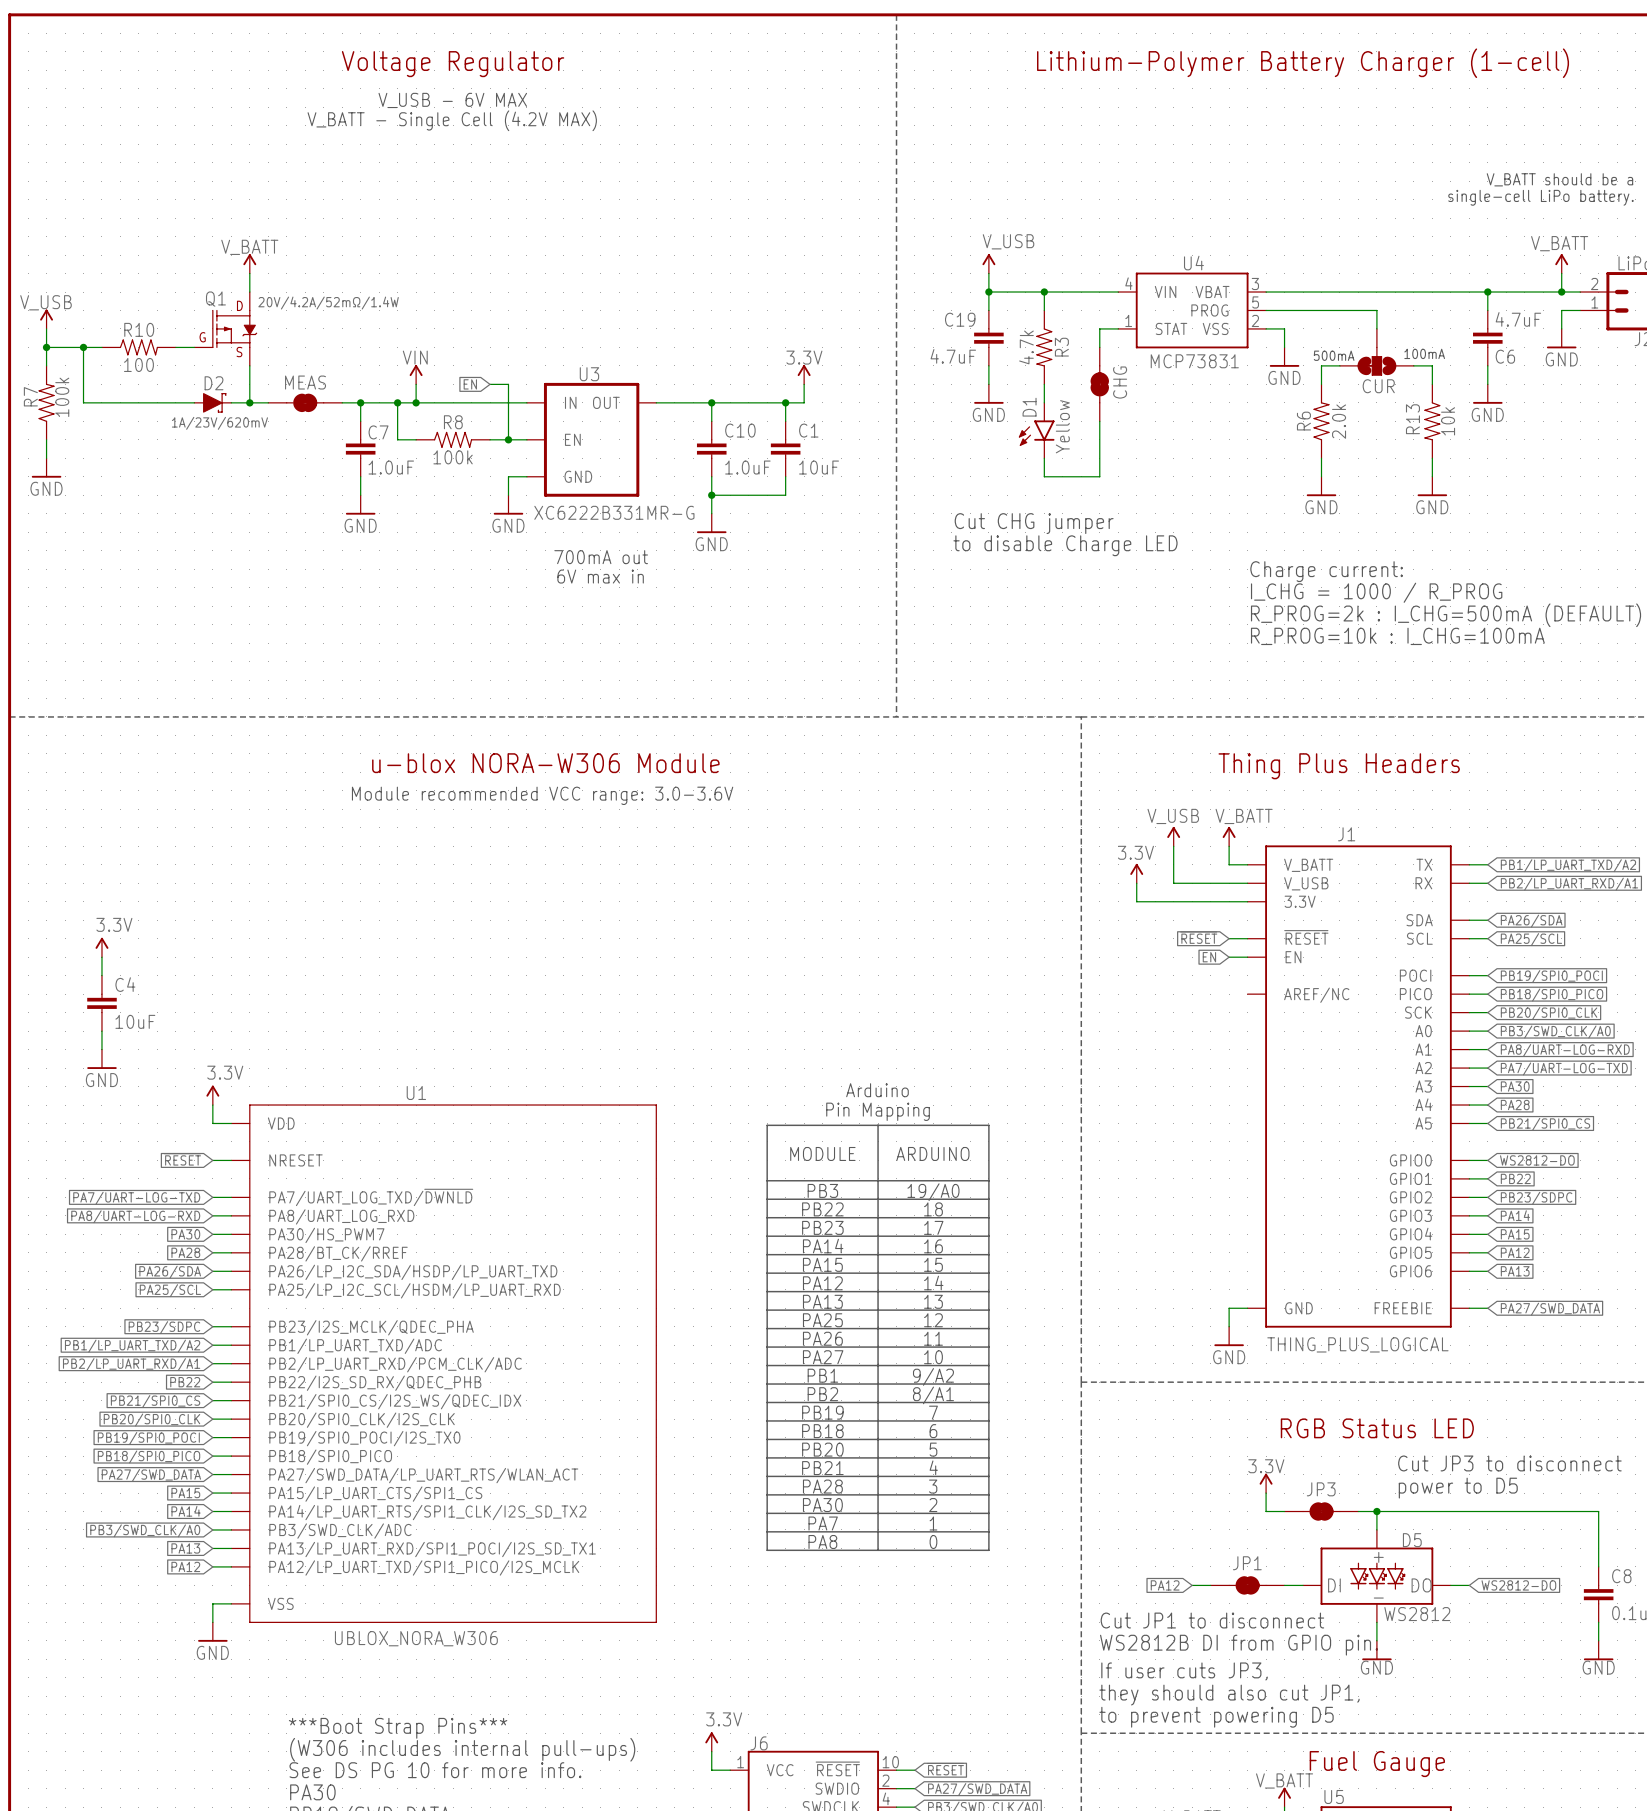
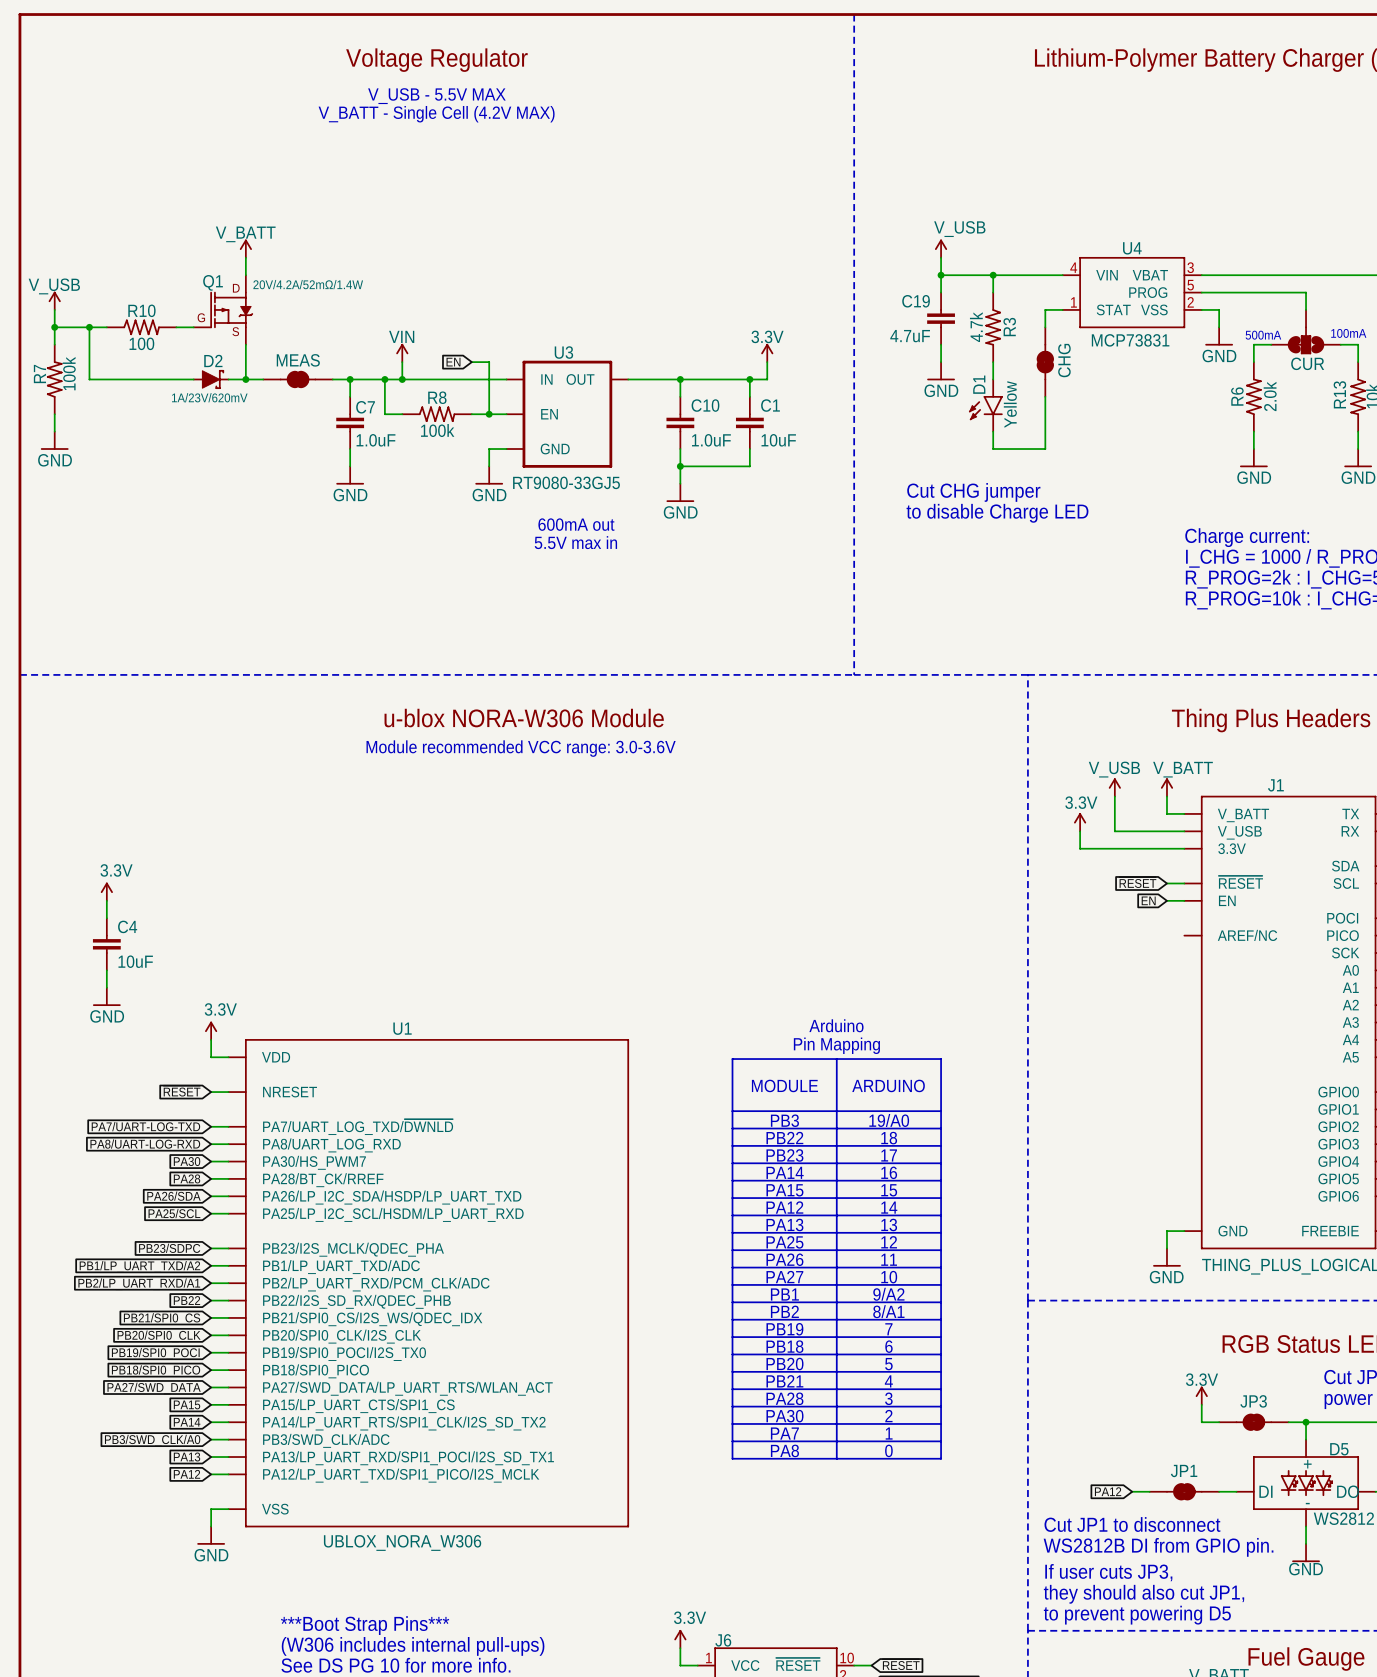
text: V_USB - 6V MAX (452, 100) -> V_USB - 5.5V MAX (436, 96)
U3 value: XC6222B331MR-G (614, 512) -> RT9080-33GJ5 (566, 482)
text: 700mA out (601, 557) -> 600mA out (576, 524)
text: 6V max in (600, 576) -> 5.5V max in (575, 542)

